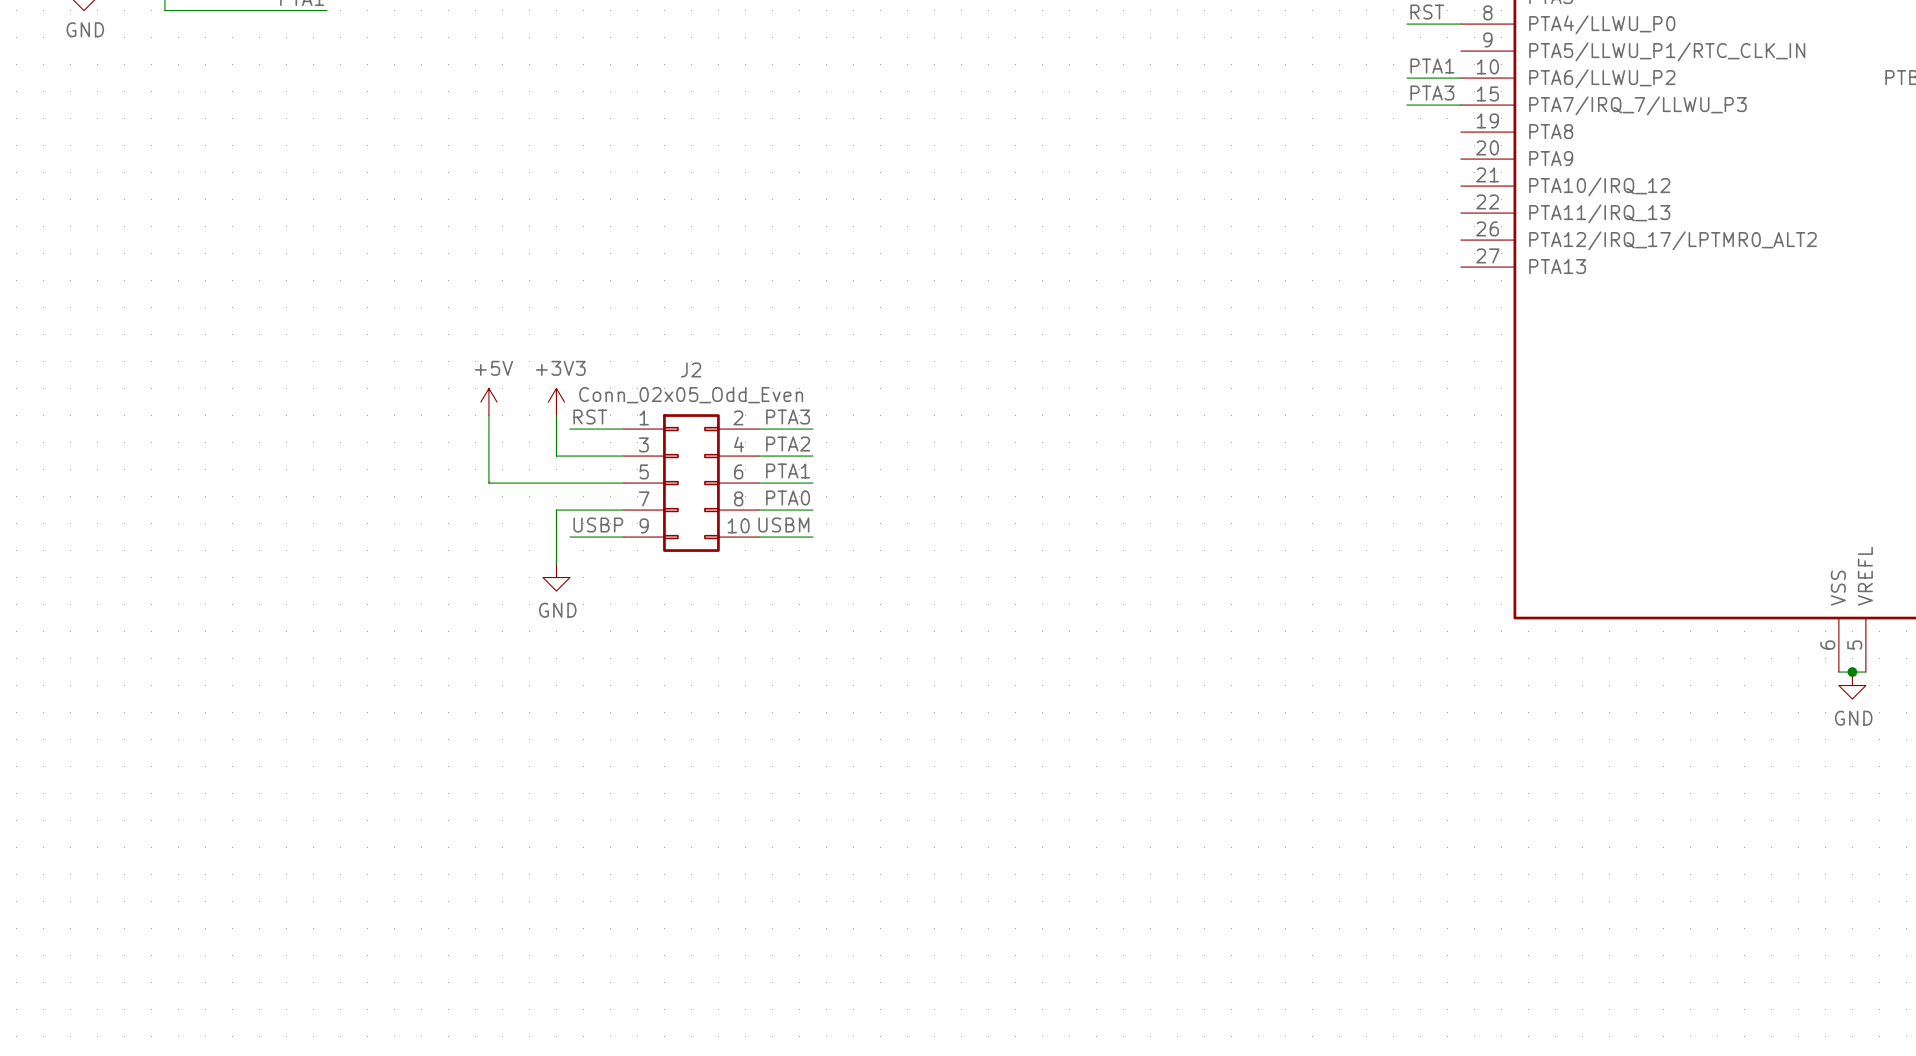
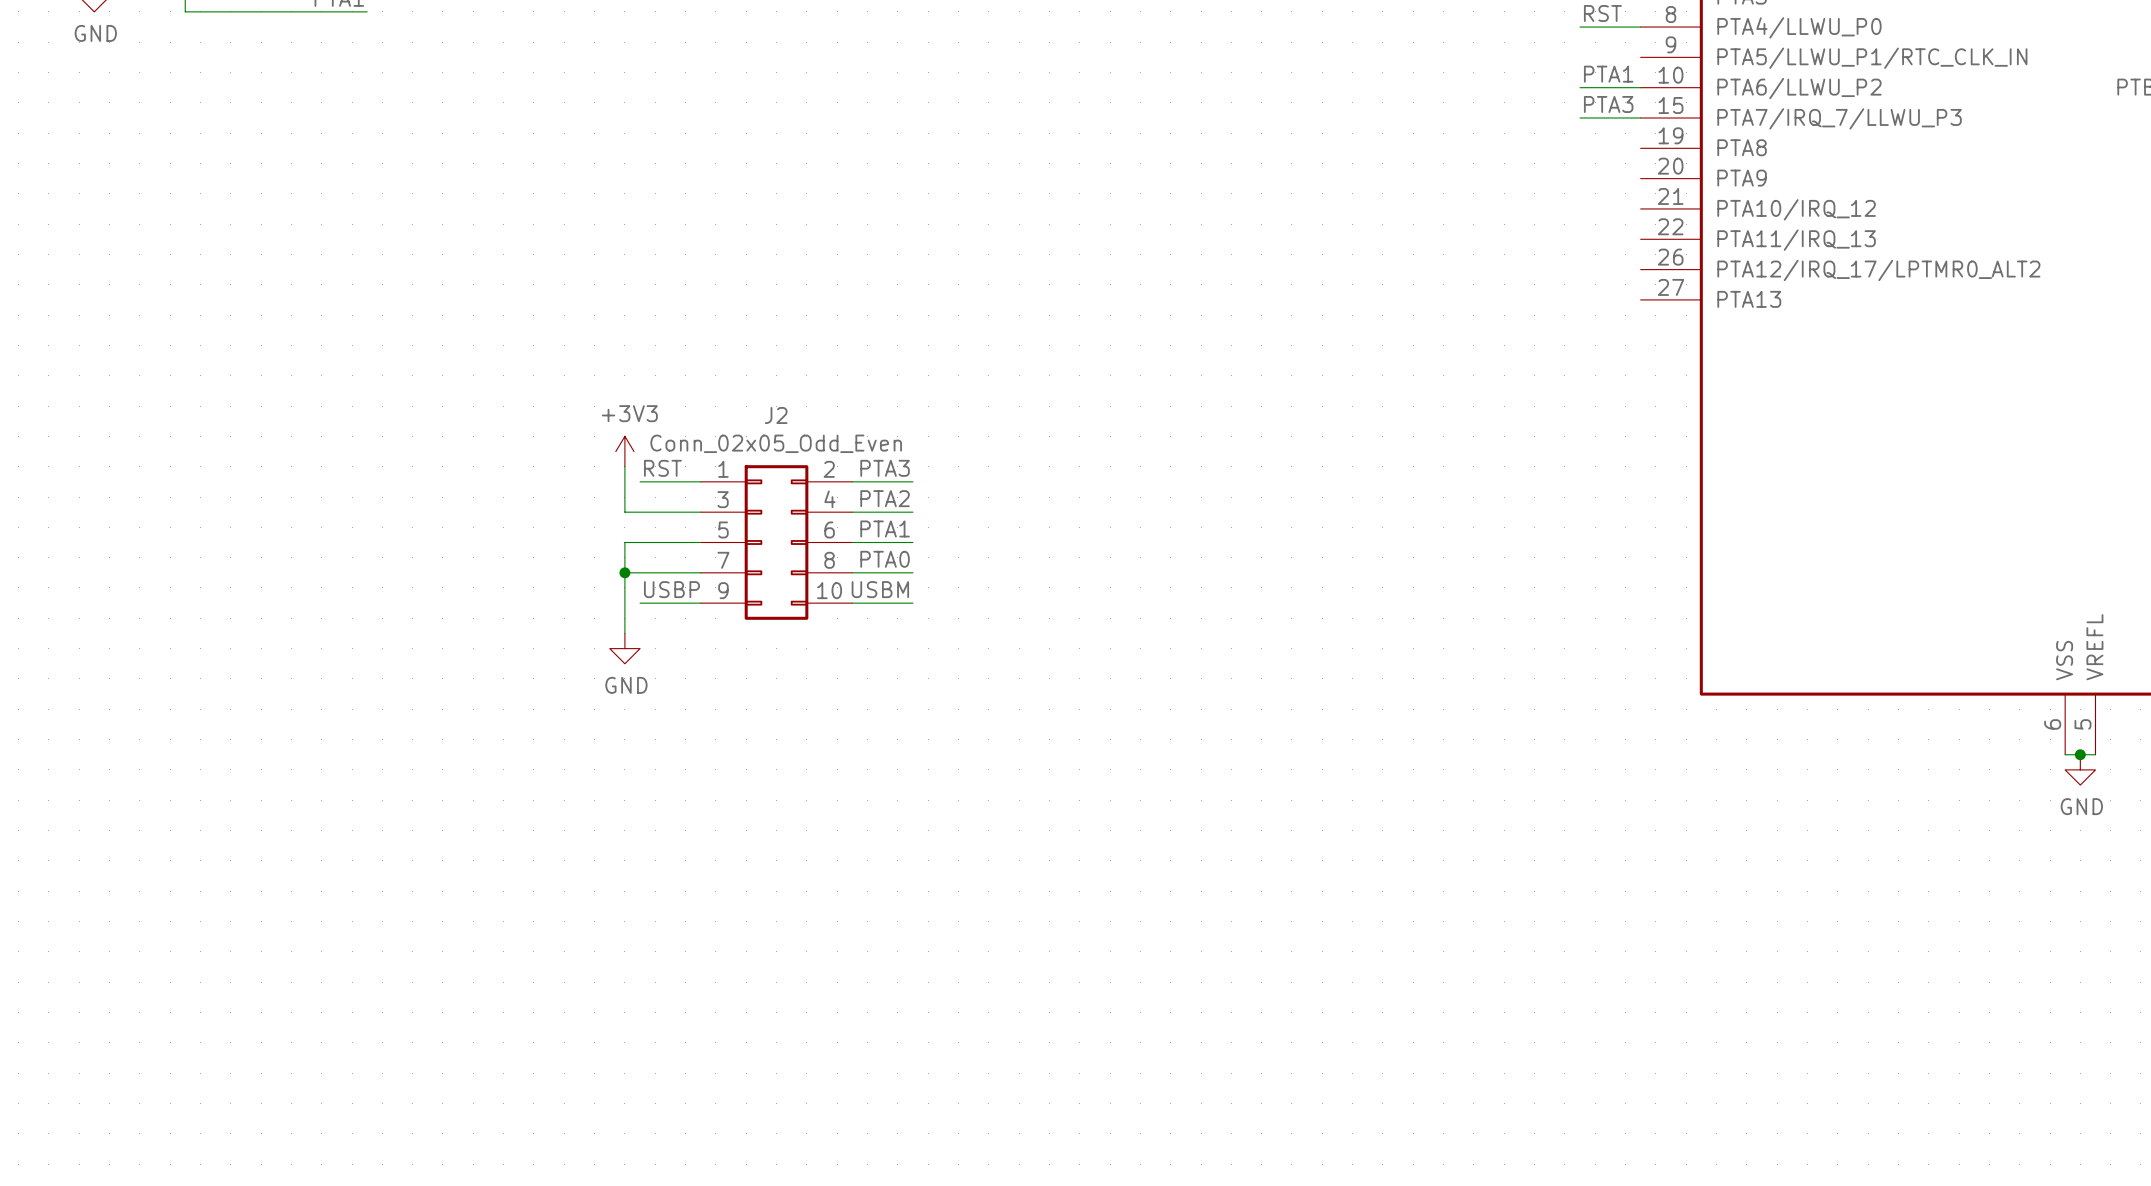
power symbol: +5V (488, 402) -> none
wire: (488, 415) (488, 483) (556, 483) -> (624, 572) (624, 542)
junction: none -> (624, 572)

